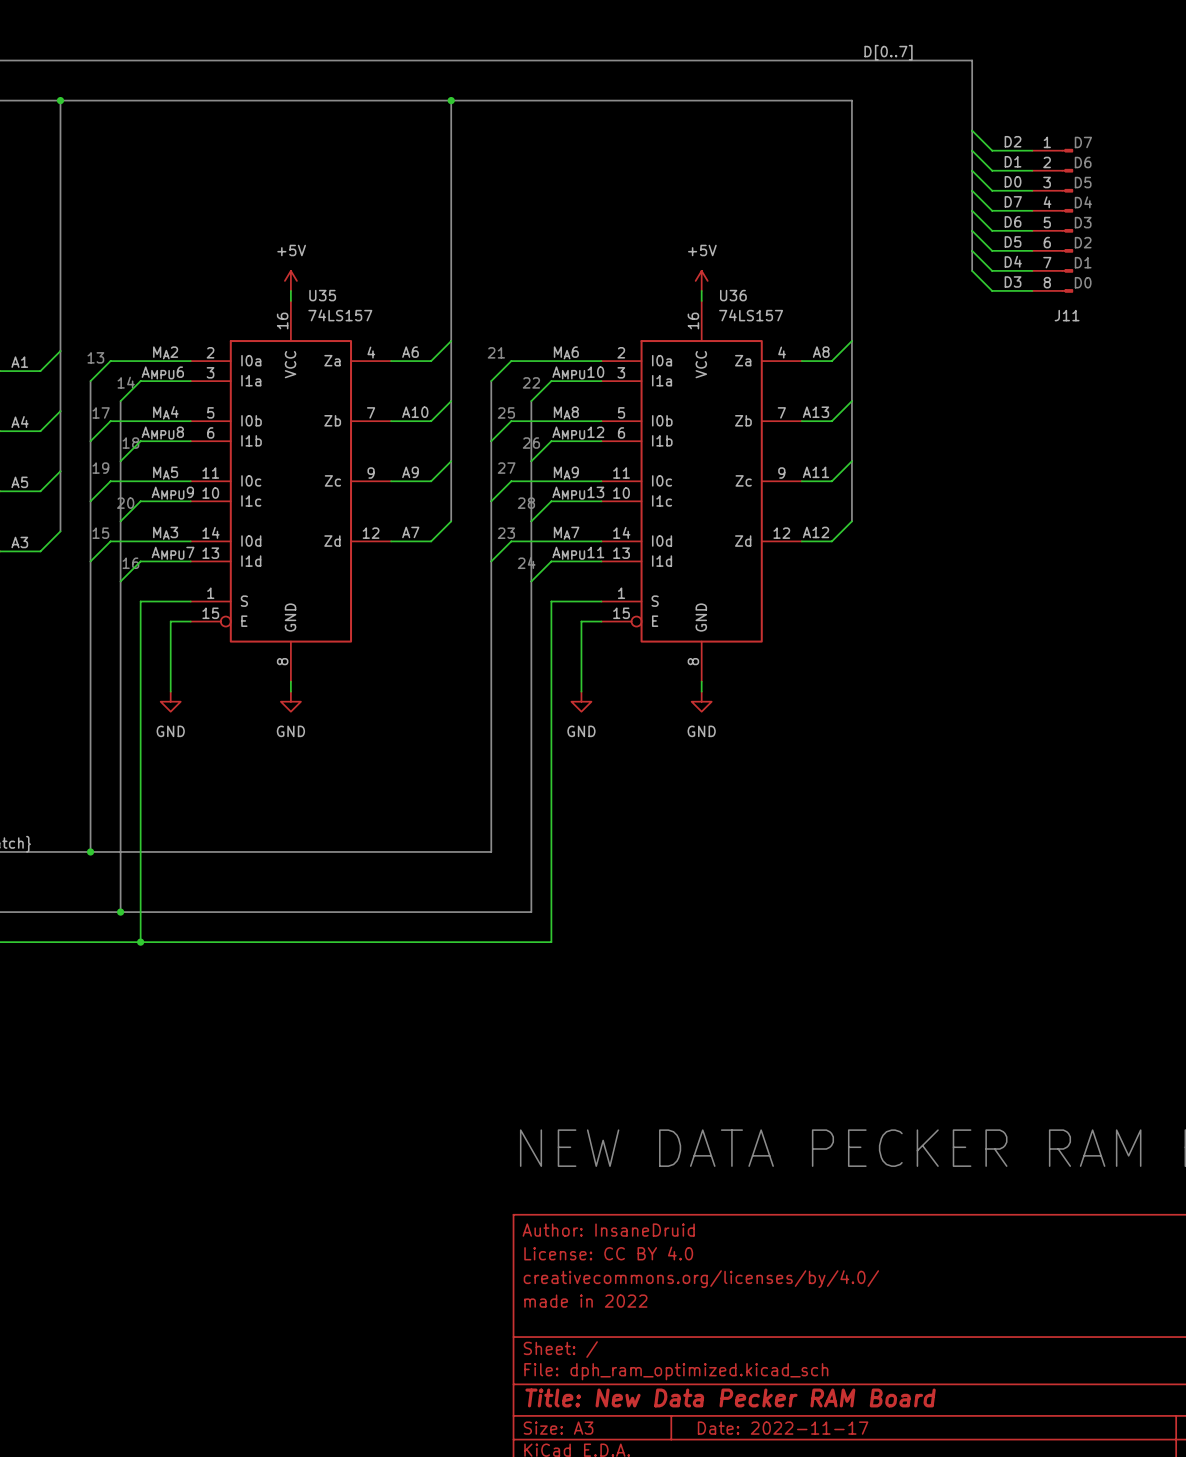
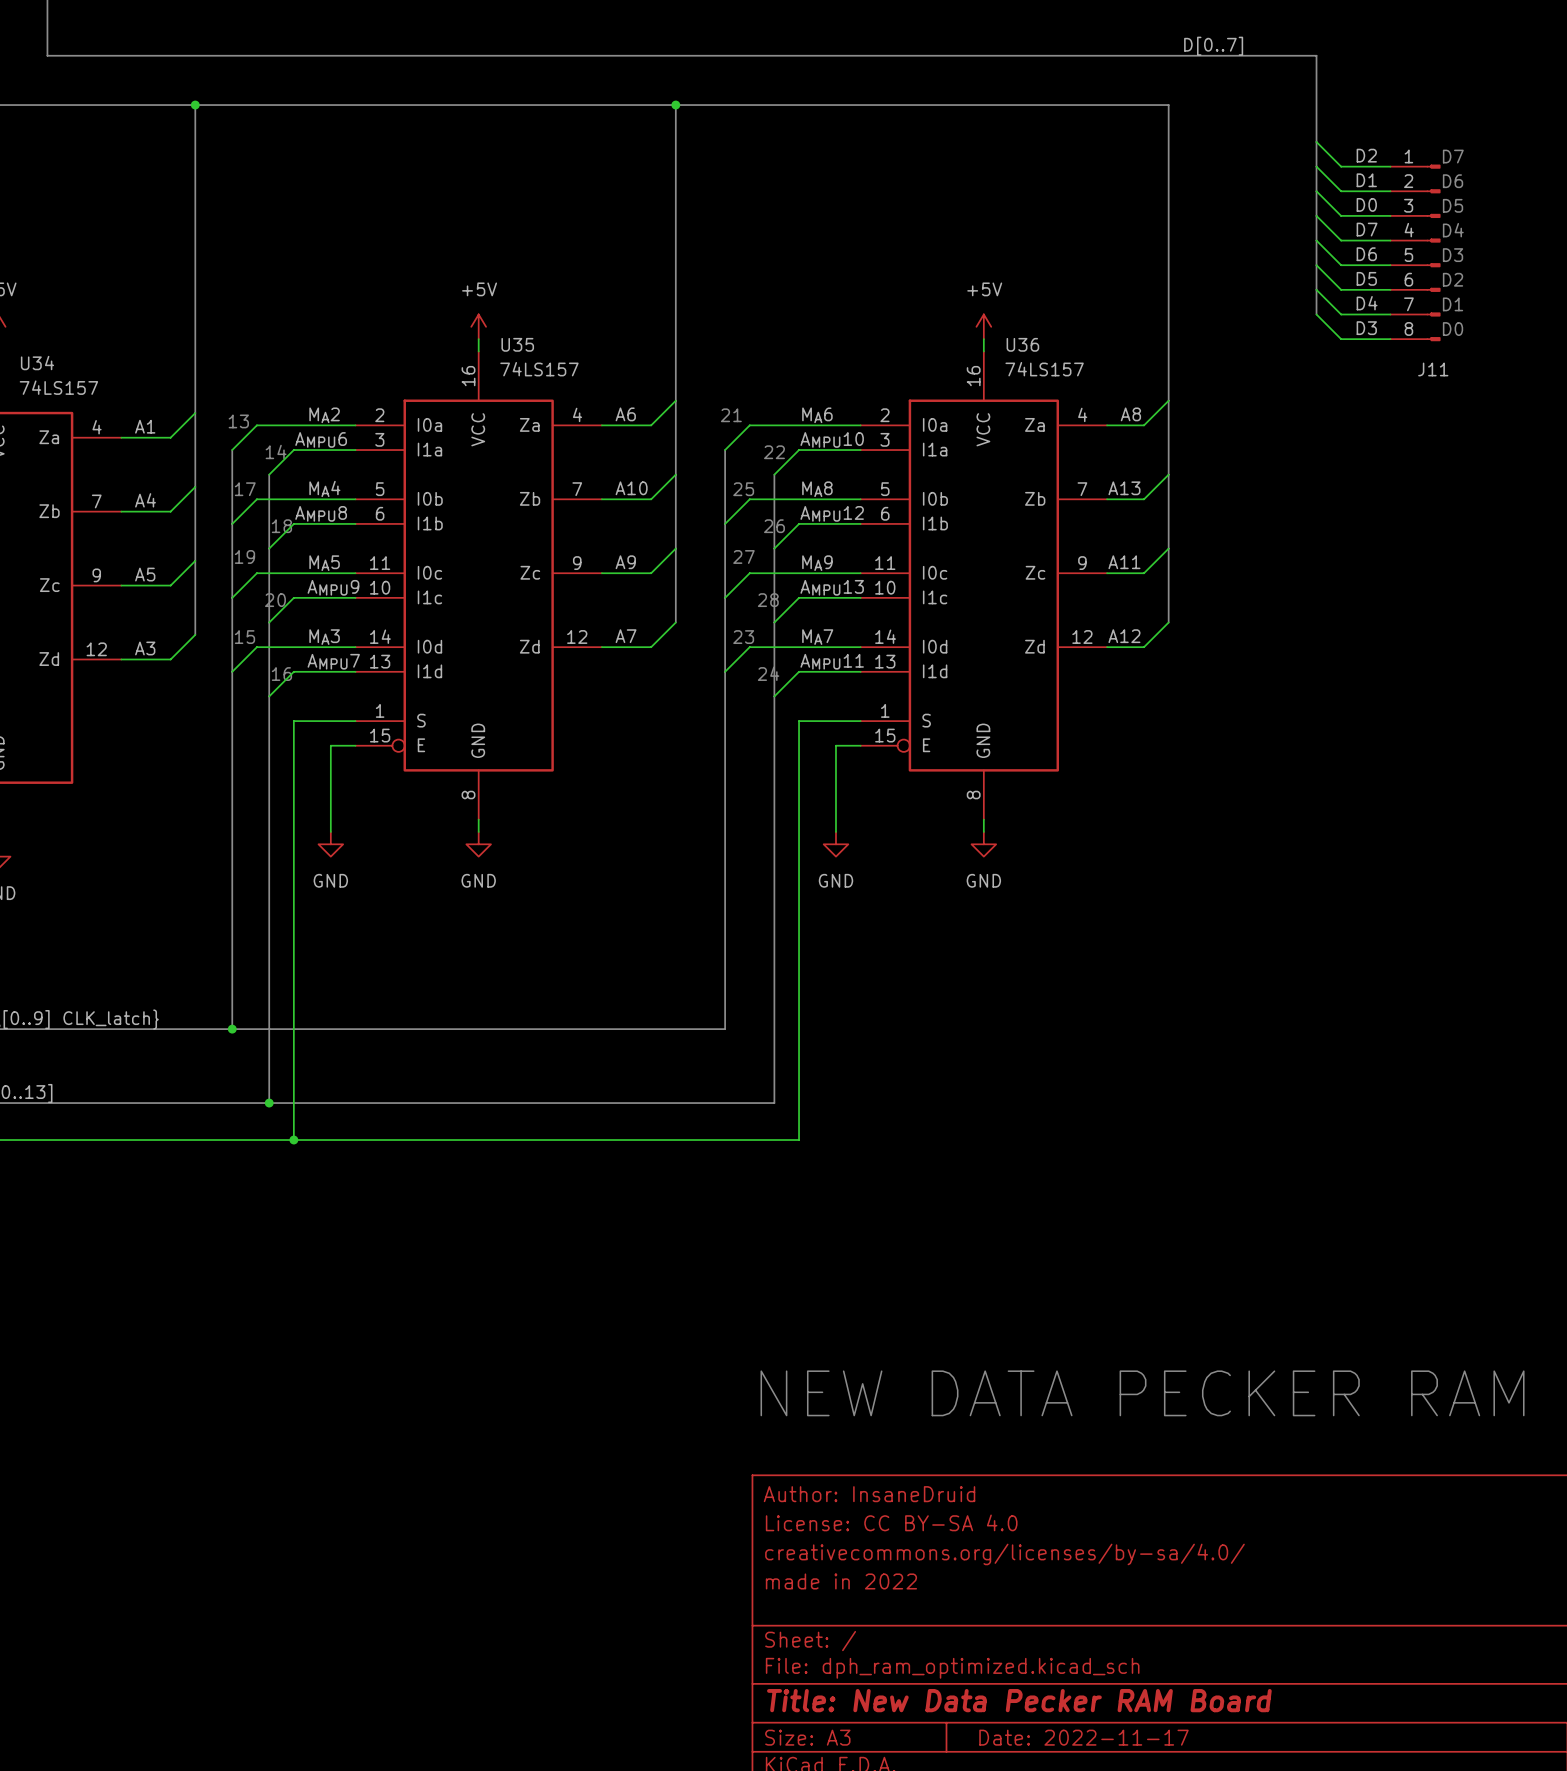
title block: License: CC BY 4.0 (608, 1253) -> License: CC BY-SA 4.0 (891, 1522)
title block: creativecommons.org/licenses/by/4.0/ (701, 1279) -> creativecommons.org/licenses/by-sa/4.0/ (1004, 1554)

